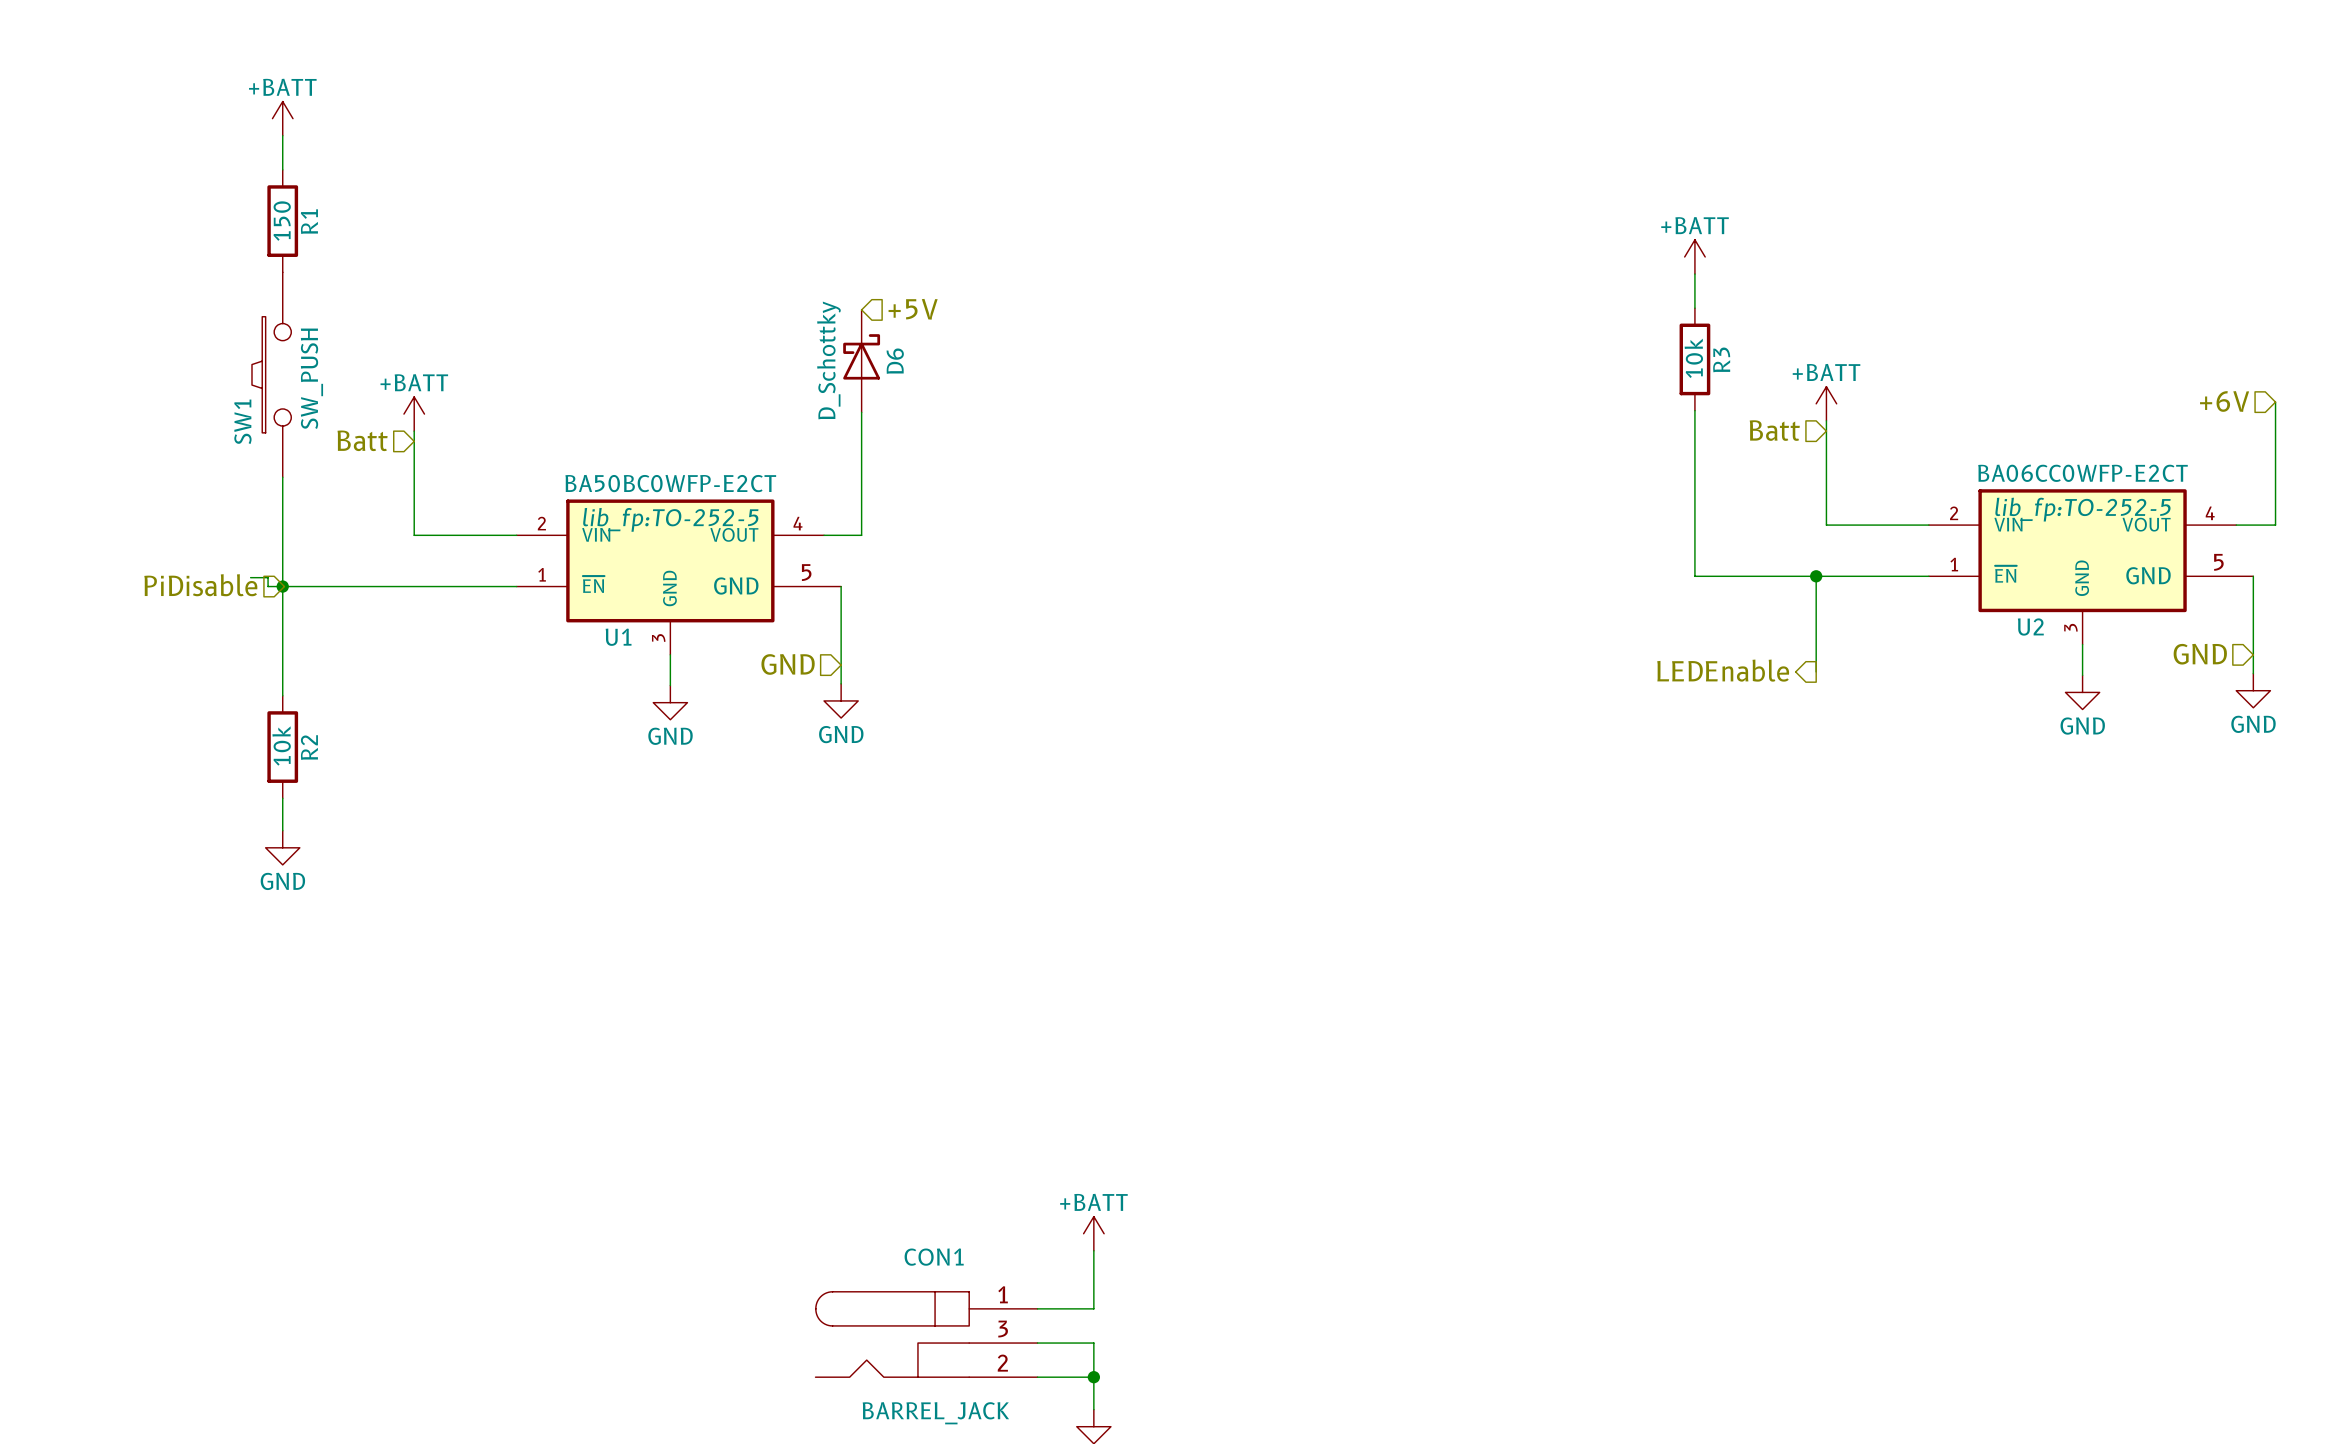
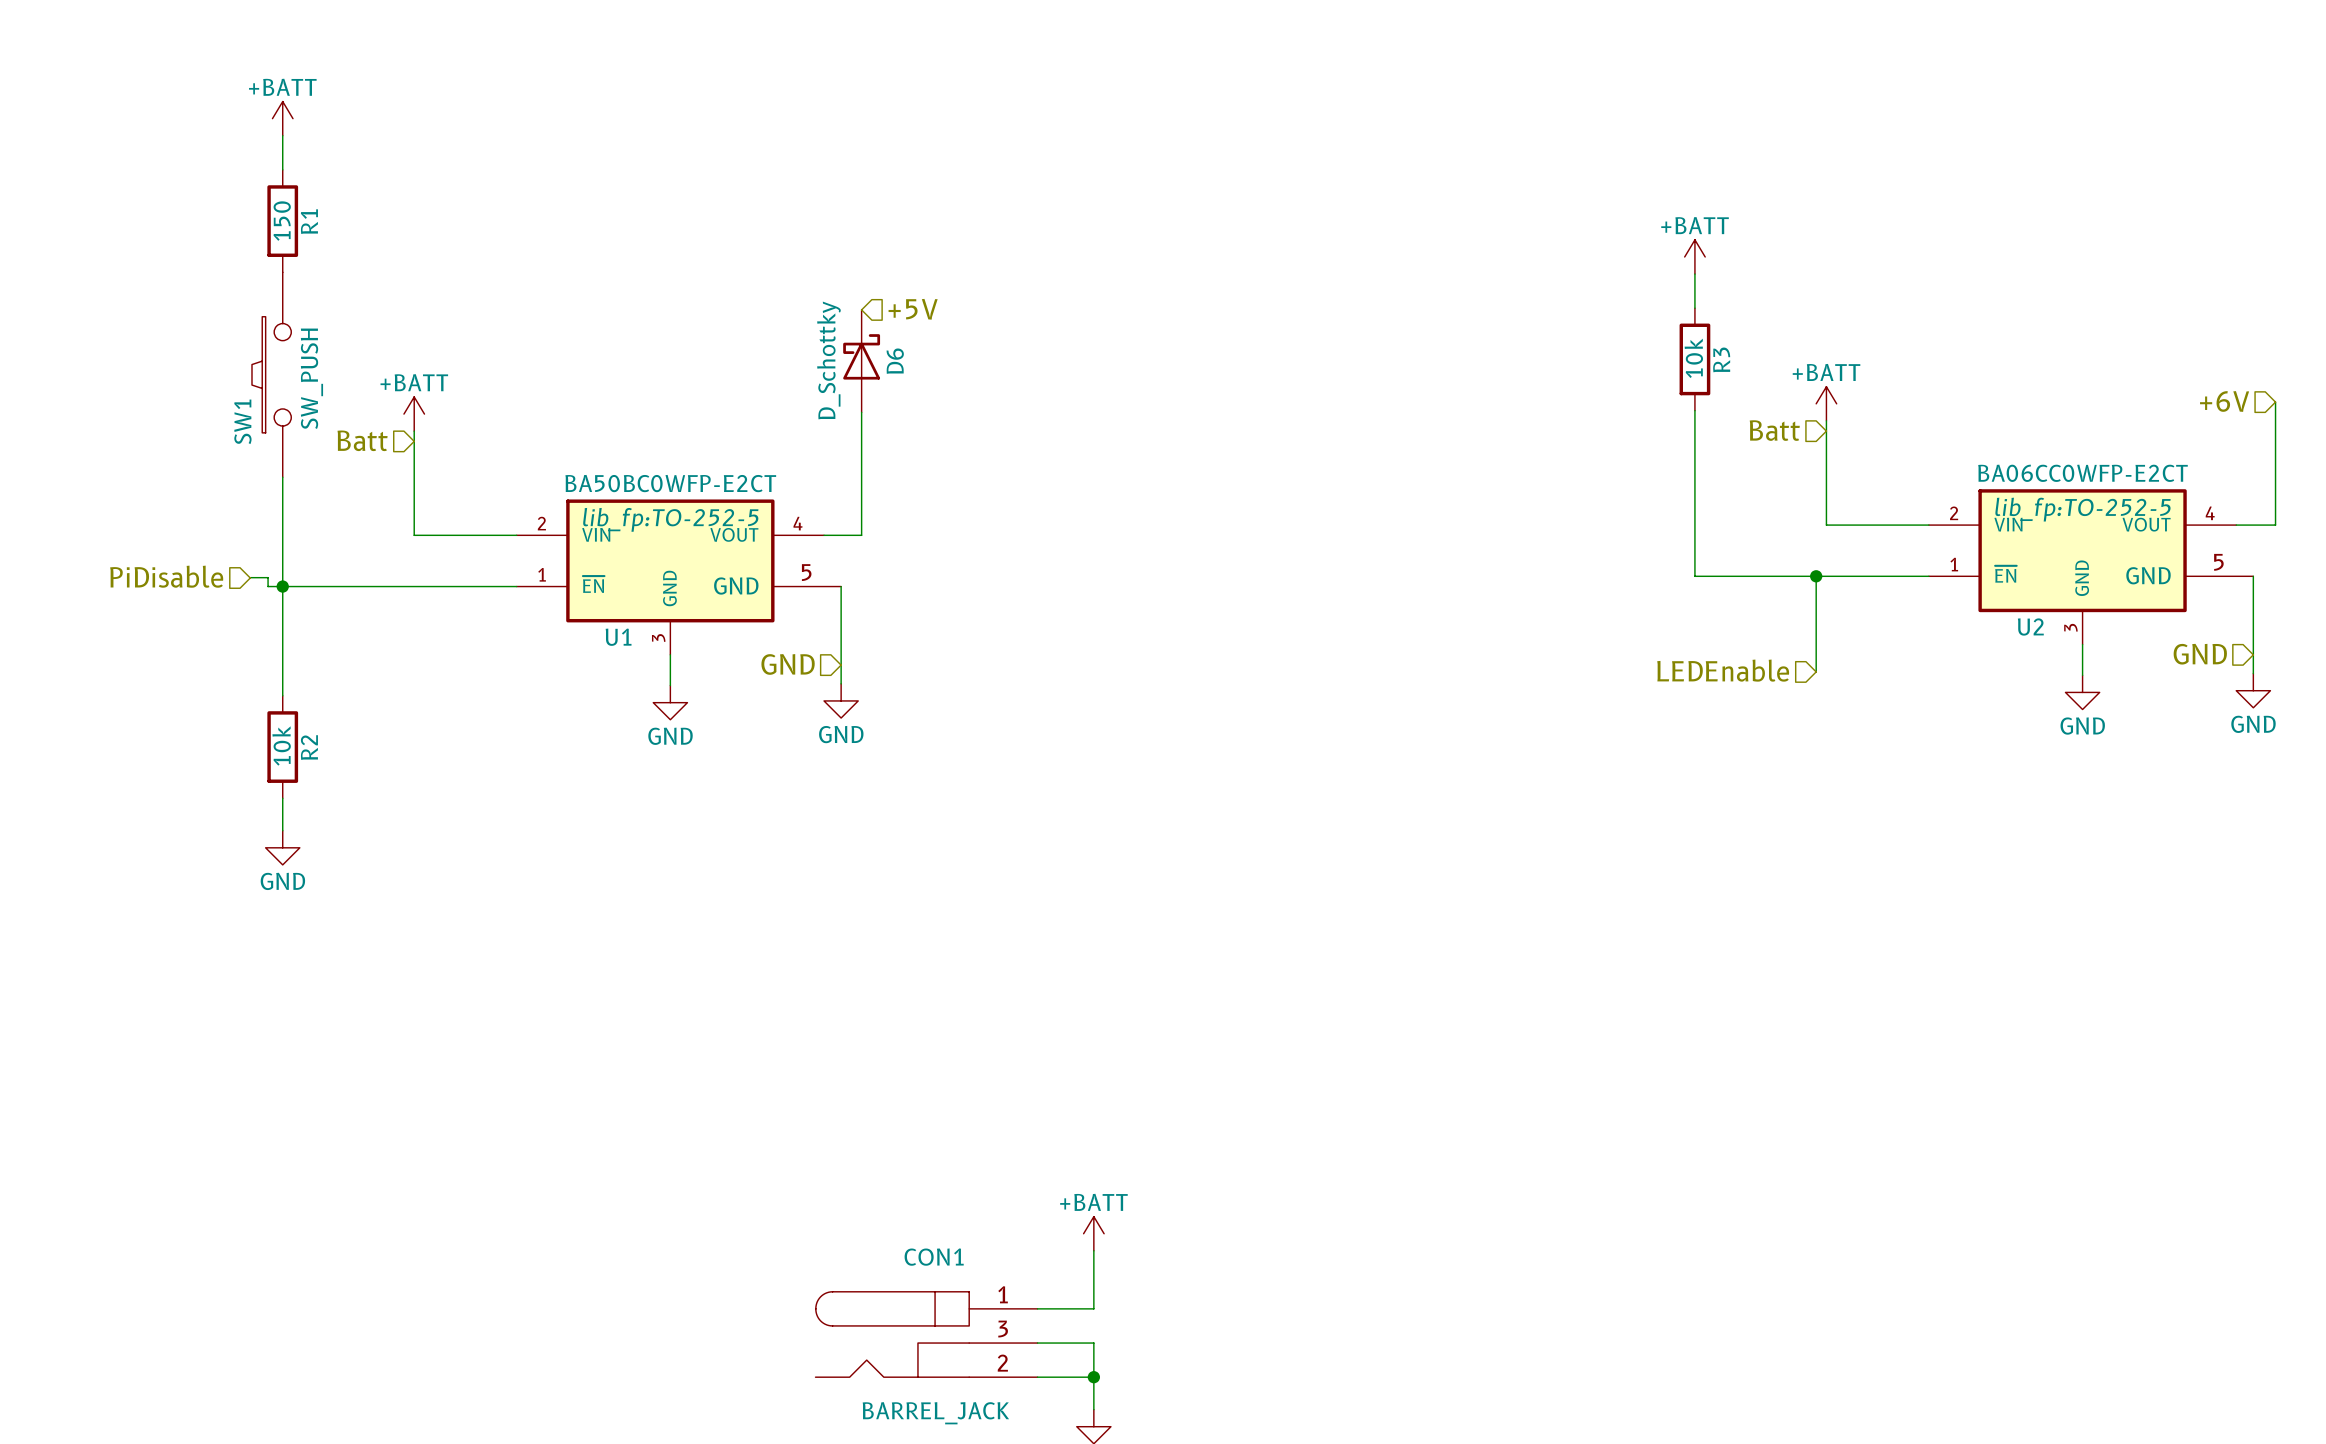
hierarchical label position: PiDisable (200, 585) -> PiDisable (166, 576)
hierarchical label shape: output (1723, 670) -> input (1723, 670)

